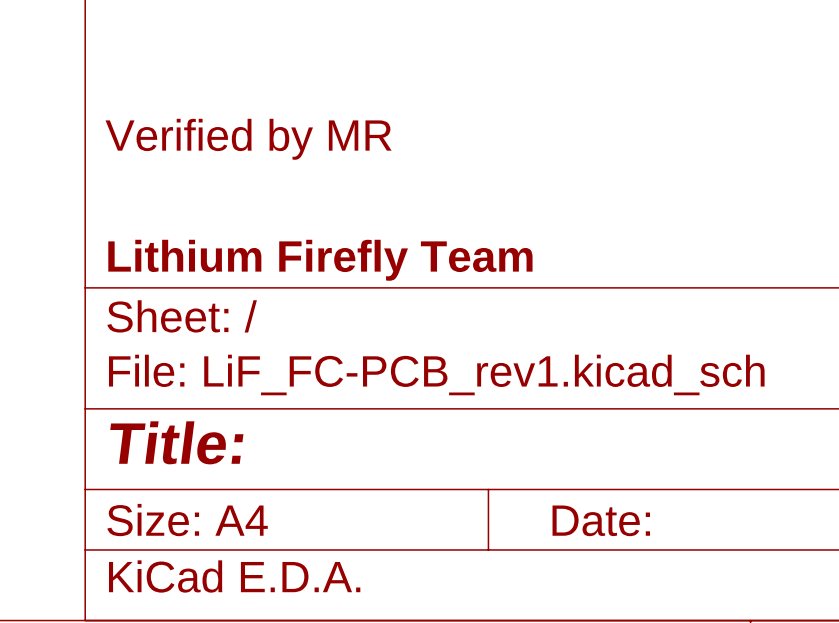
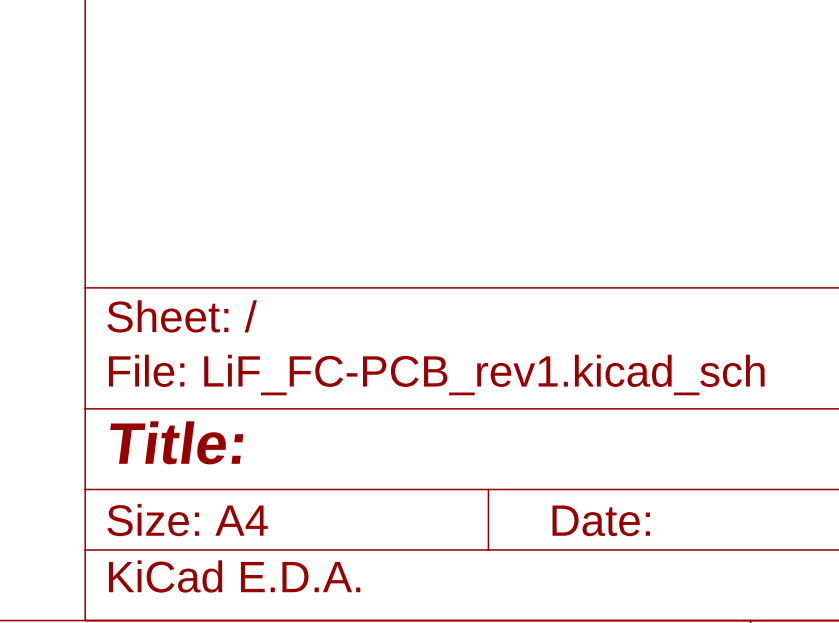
title block: Verified by MR (248, 139) -> none
title block: Lithium Firefly Team (320, 260) -> none

